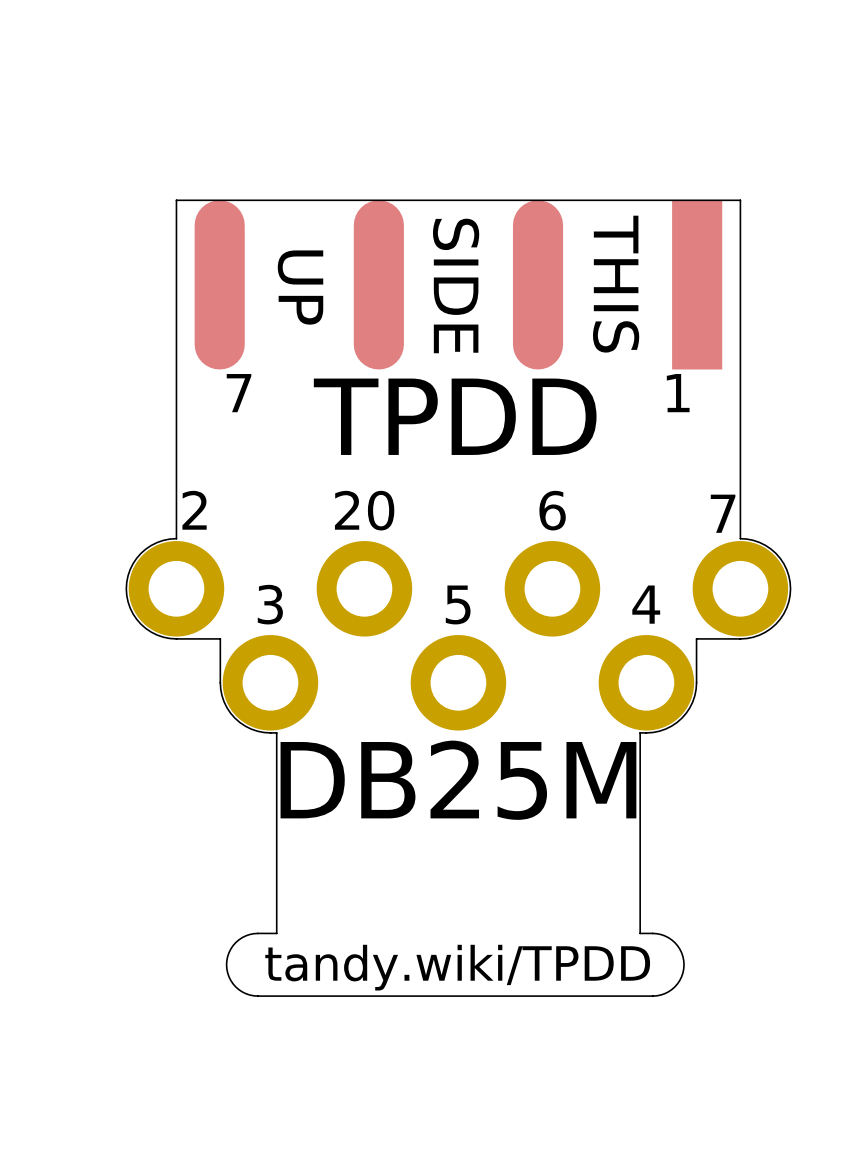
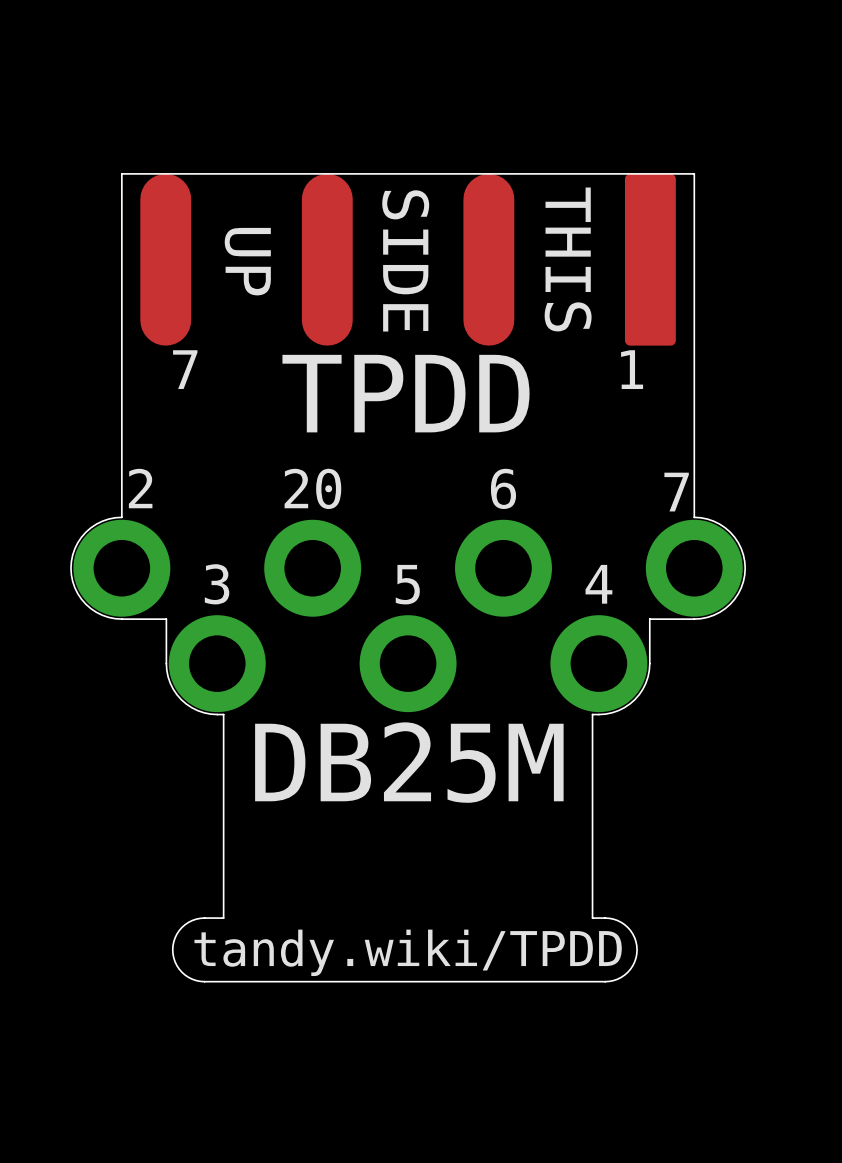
part footprint: [194, 200, 723, 370] -> [140, 173, 676, 346]

